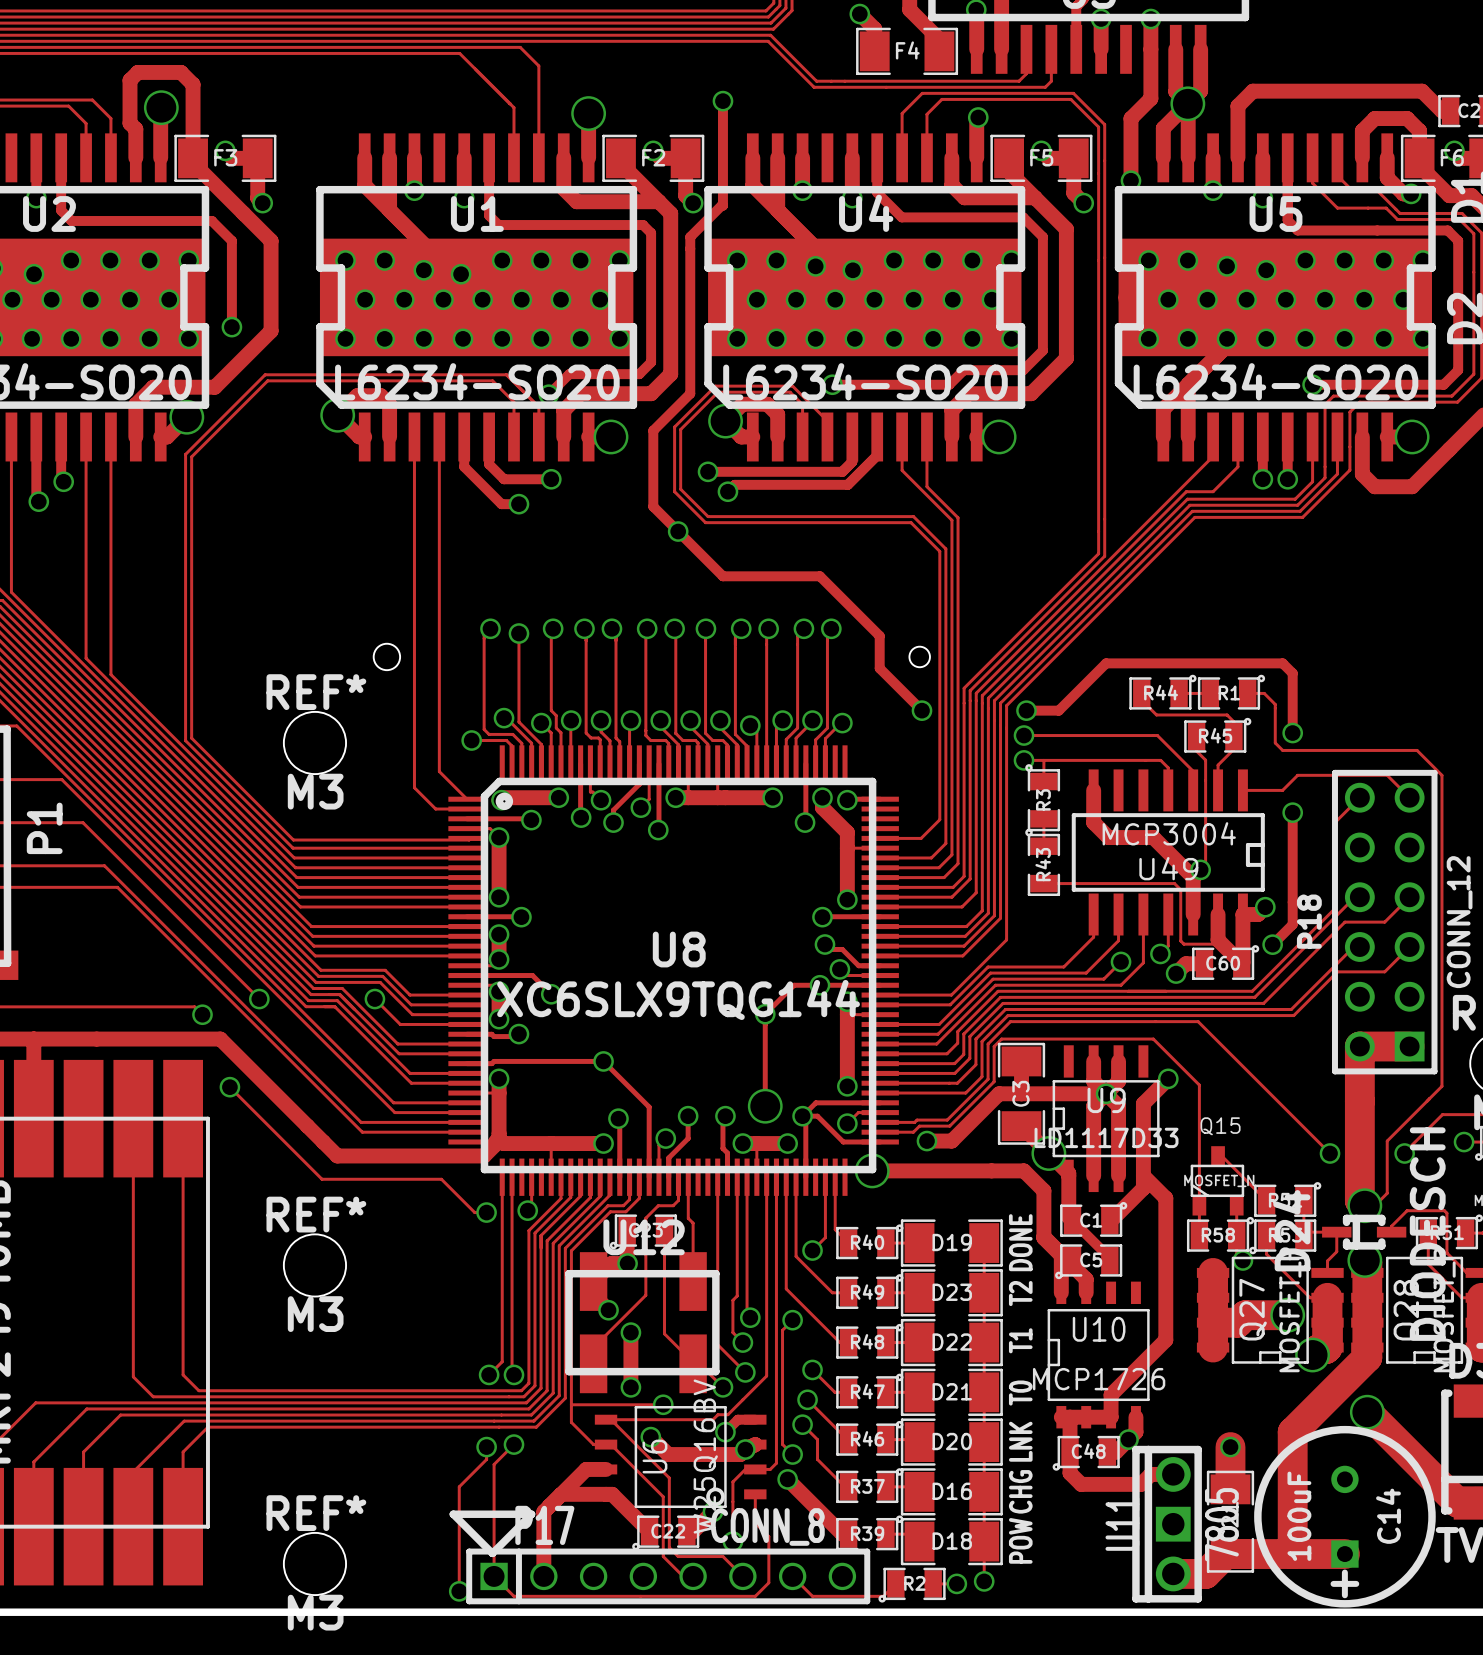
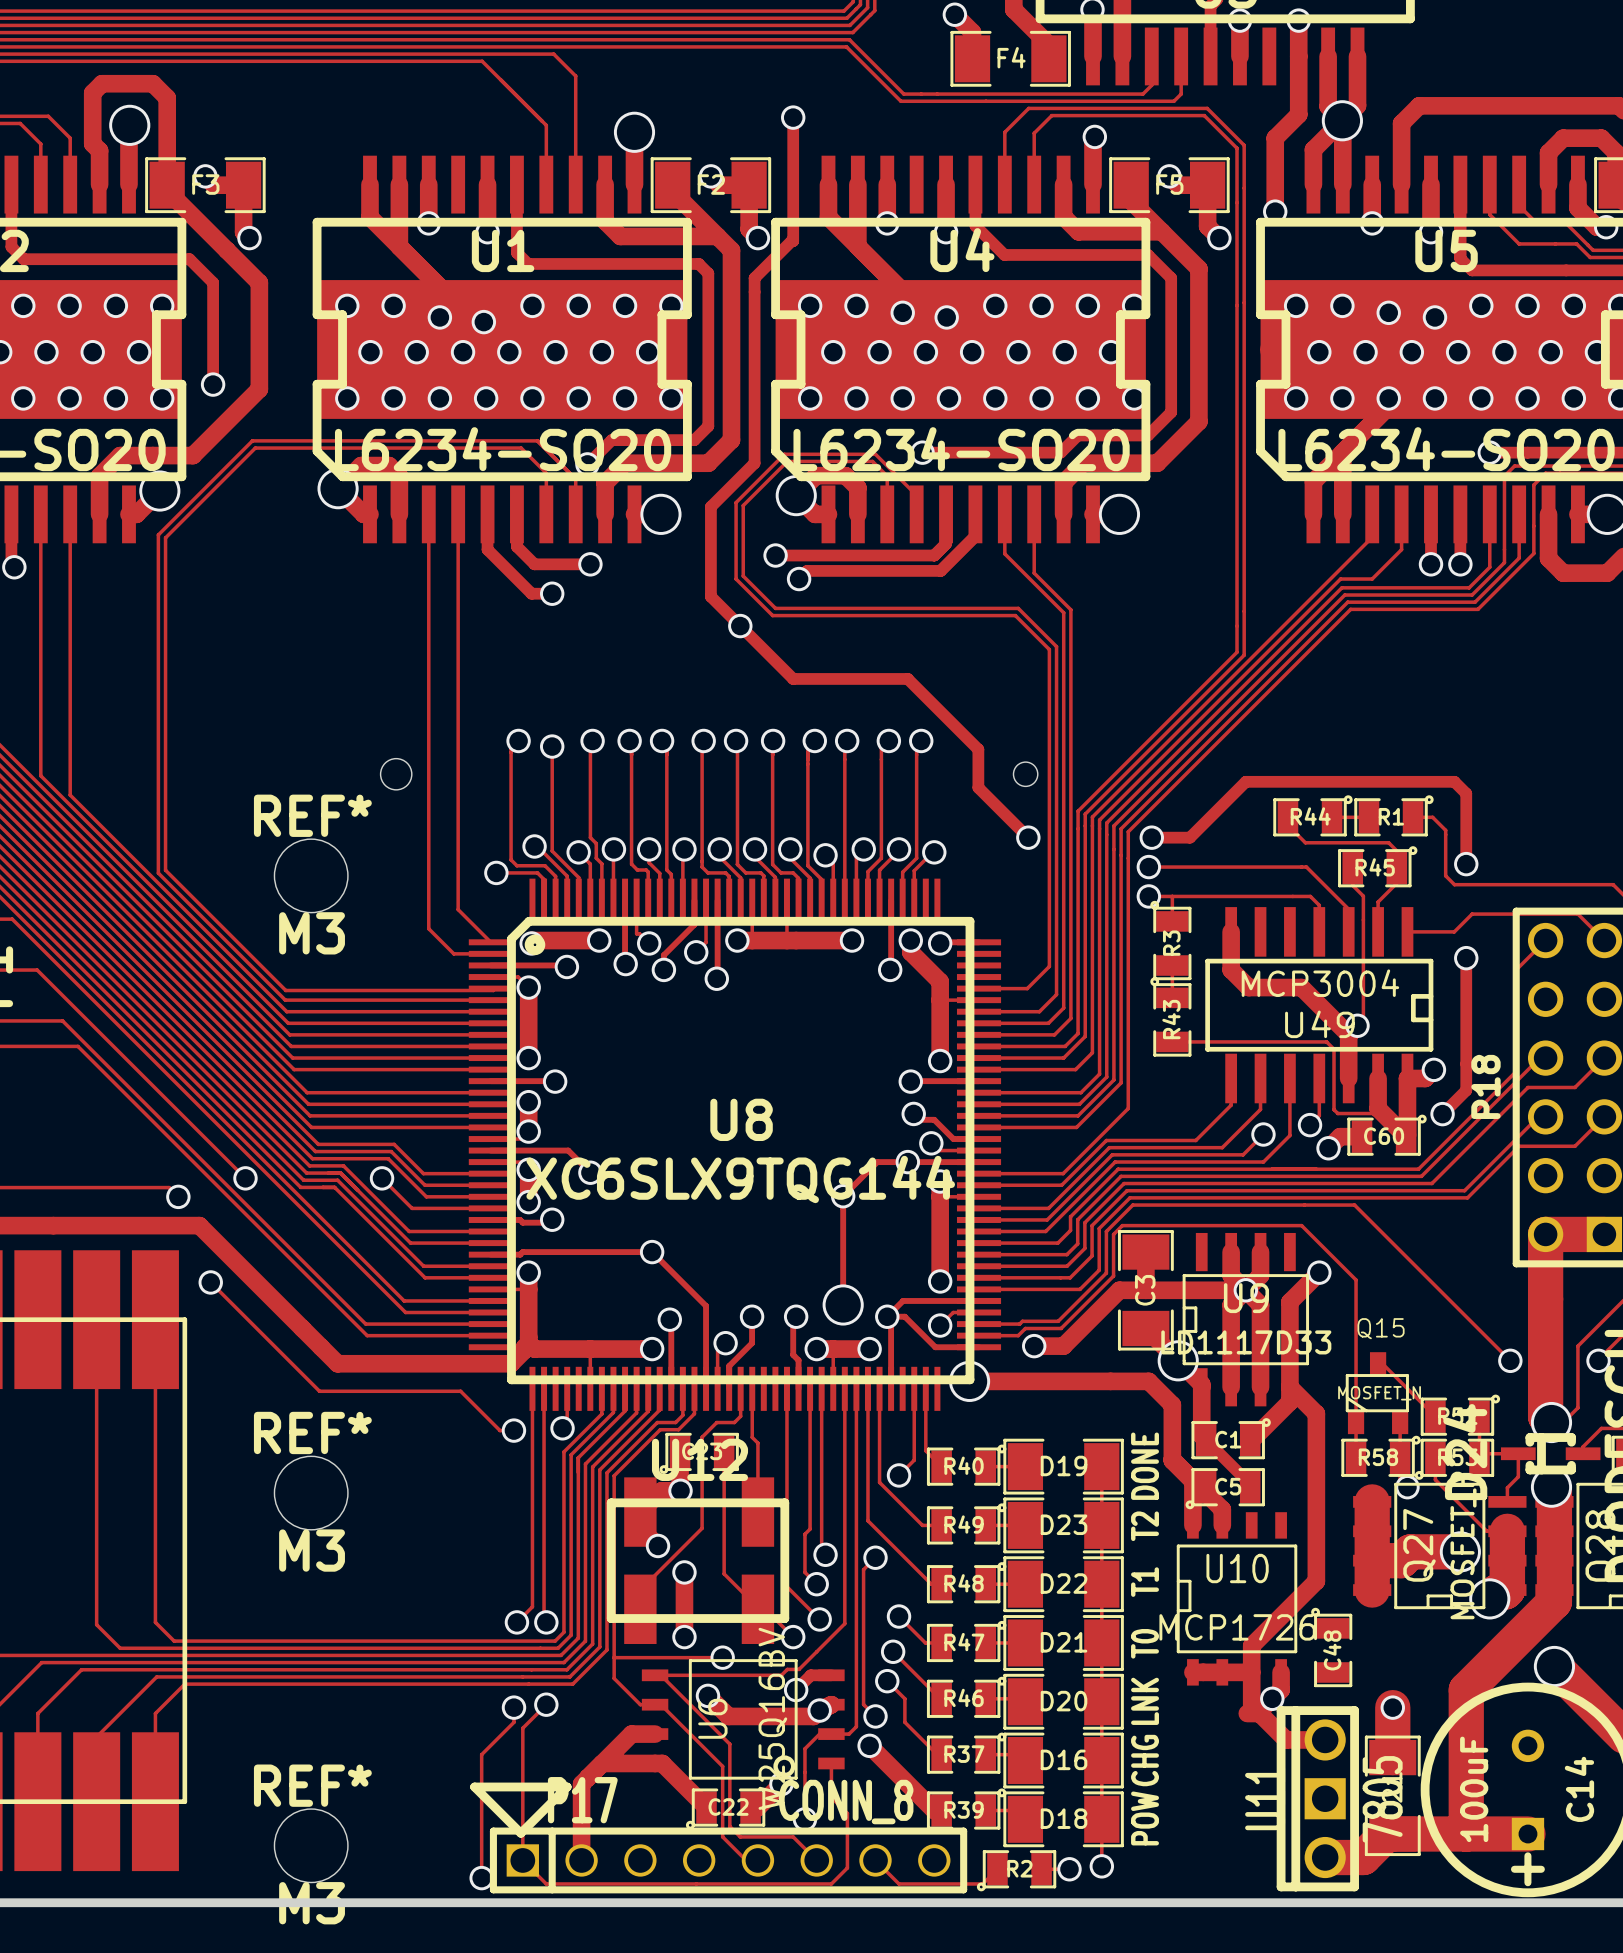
track: (1070, 1417) (1070, 1473) (1081, 1484) (1140, 1484) (1150, 1474) -> (1251, 1672) (1251, 1705) (1286, 1739) (1298, 1739)
C48 rotation: 0° (1086, 1453) -> 90° clockwise (1331, 1647)
C48 position: (1086, 1453) -> (1331, 1647)

